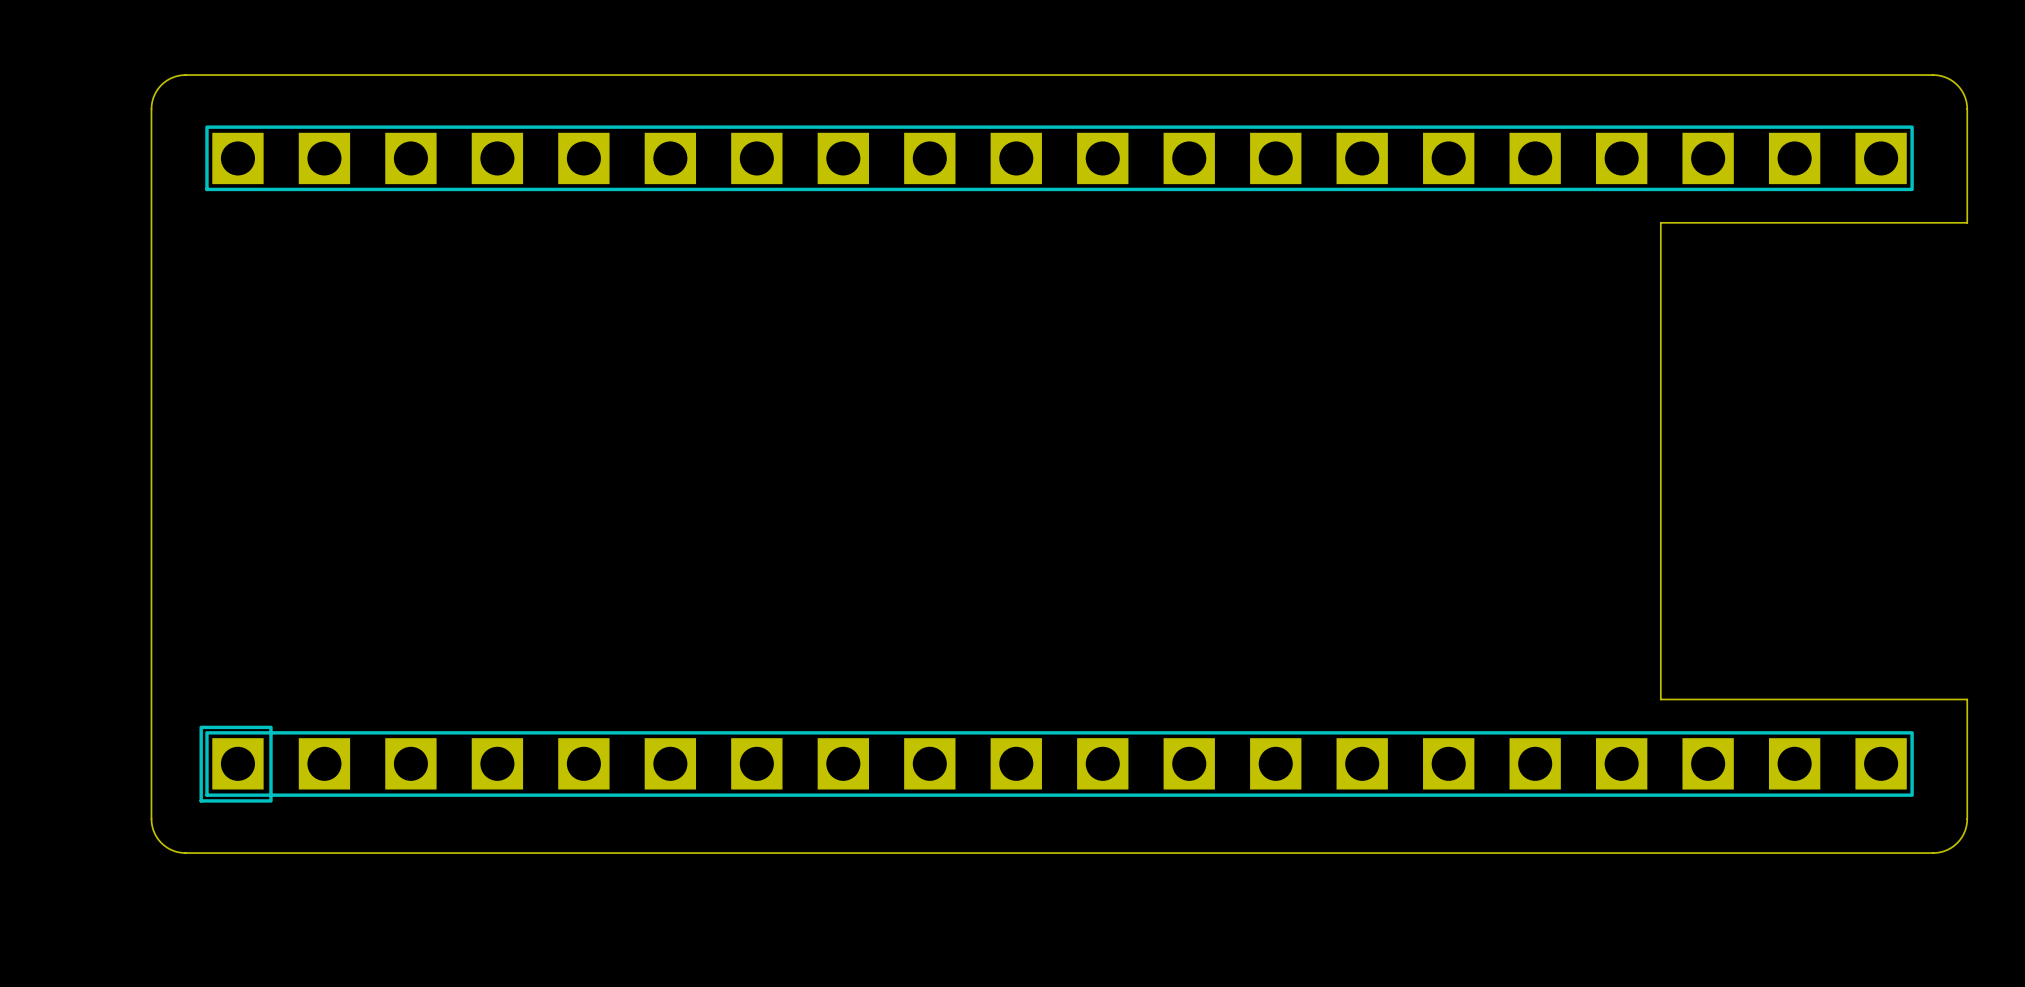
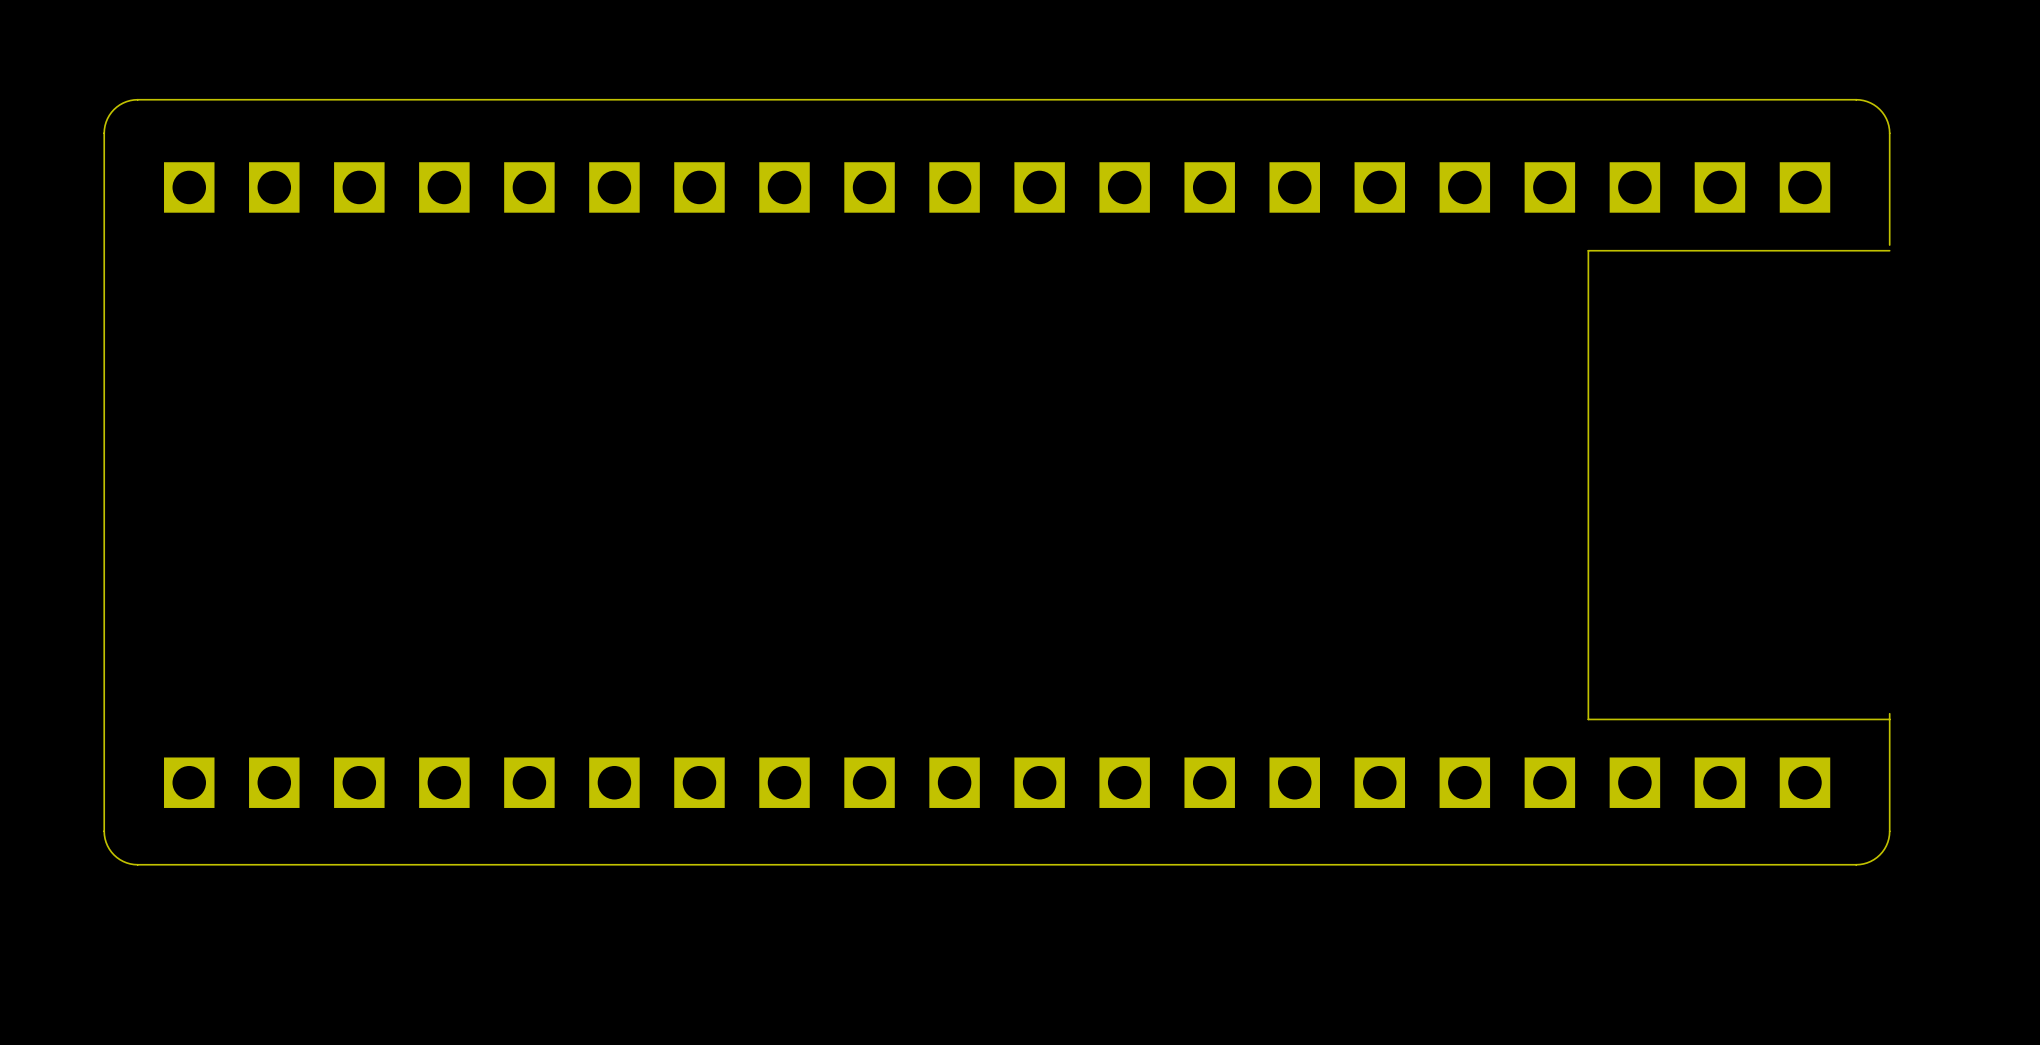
part side: top (1083, 464) -> bottom (1027, 485)

